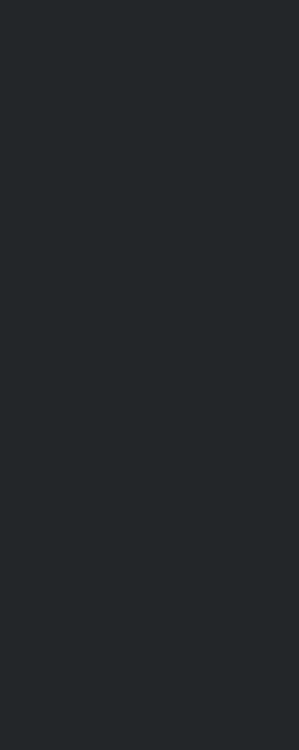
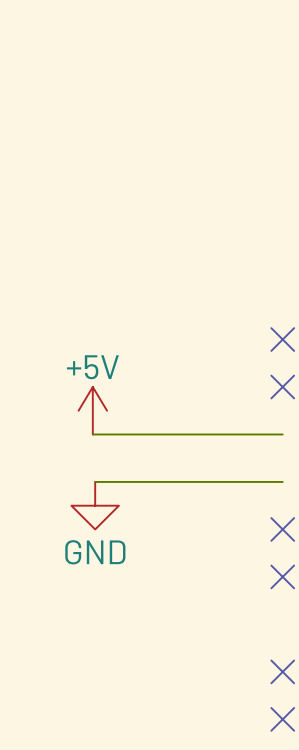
no-connect mark: none -> (282, 339)
no-connect mark: none -> (282, 387)
power symbol: none -> +5V (92, 410)
wire: none -> (92, 434) (282, 434)
wire: none -> (95, 481) (282, 481)
power symbol: none -> GND (95, 505)
no-connect mark: none -> (282, 529)
no-connect mark: none -> (282, 576)
no-connect mark: none -> (282, 671)
no-connect mark: none -> (282, 719)

